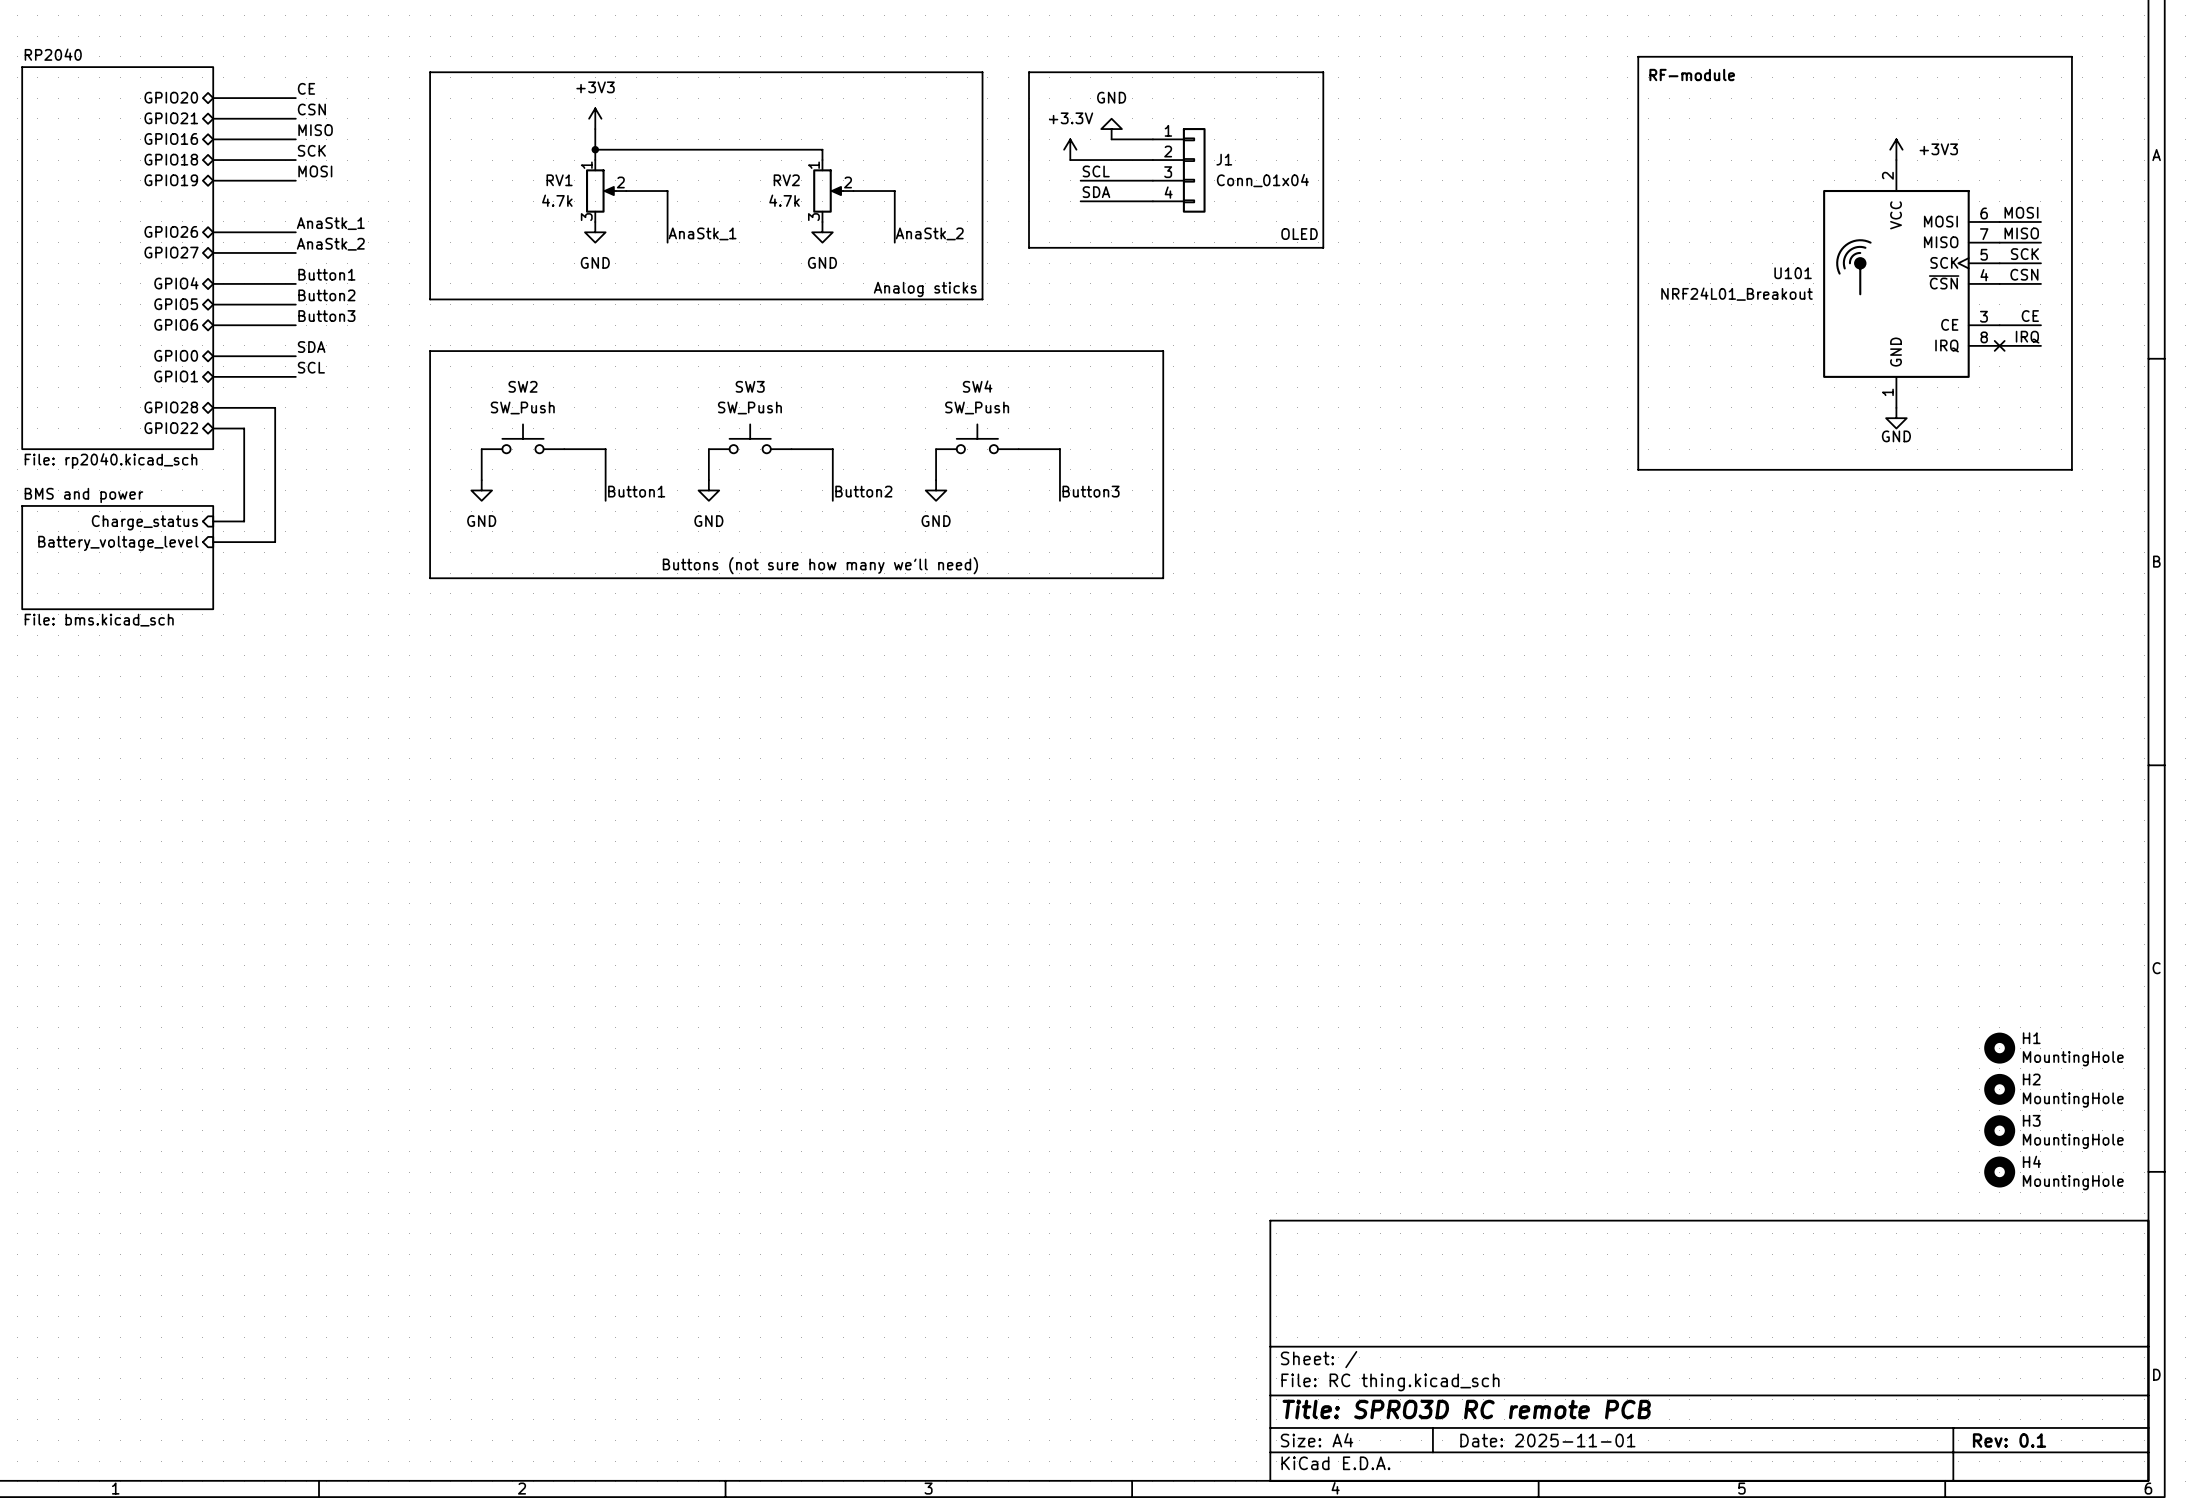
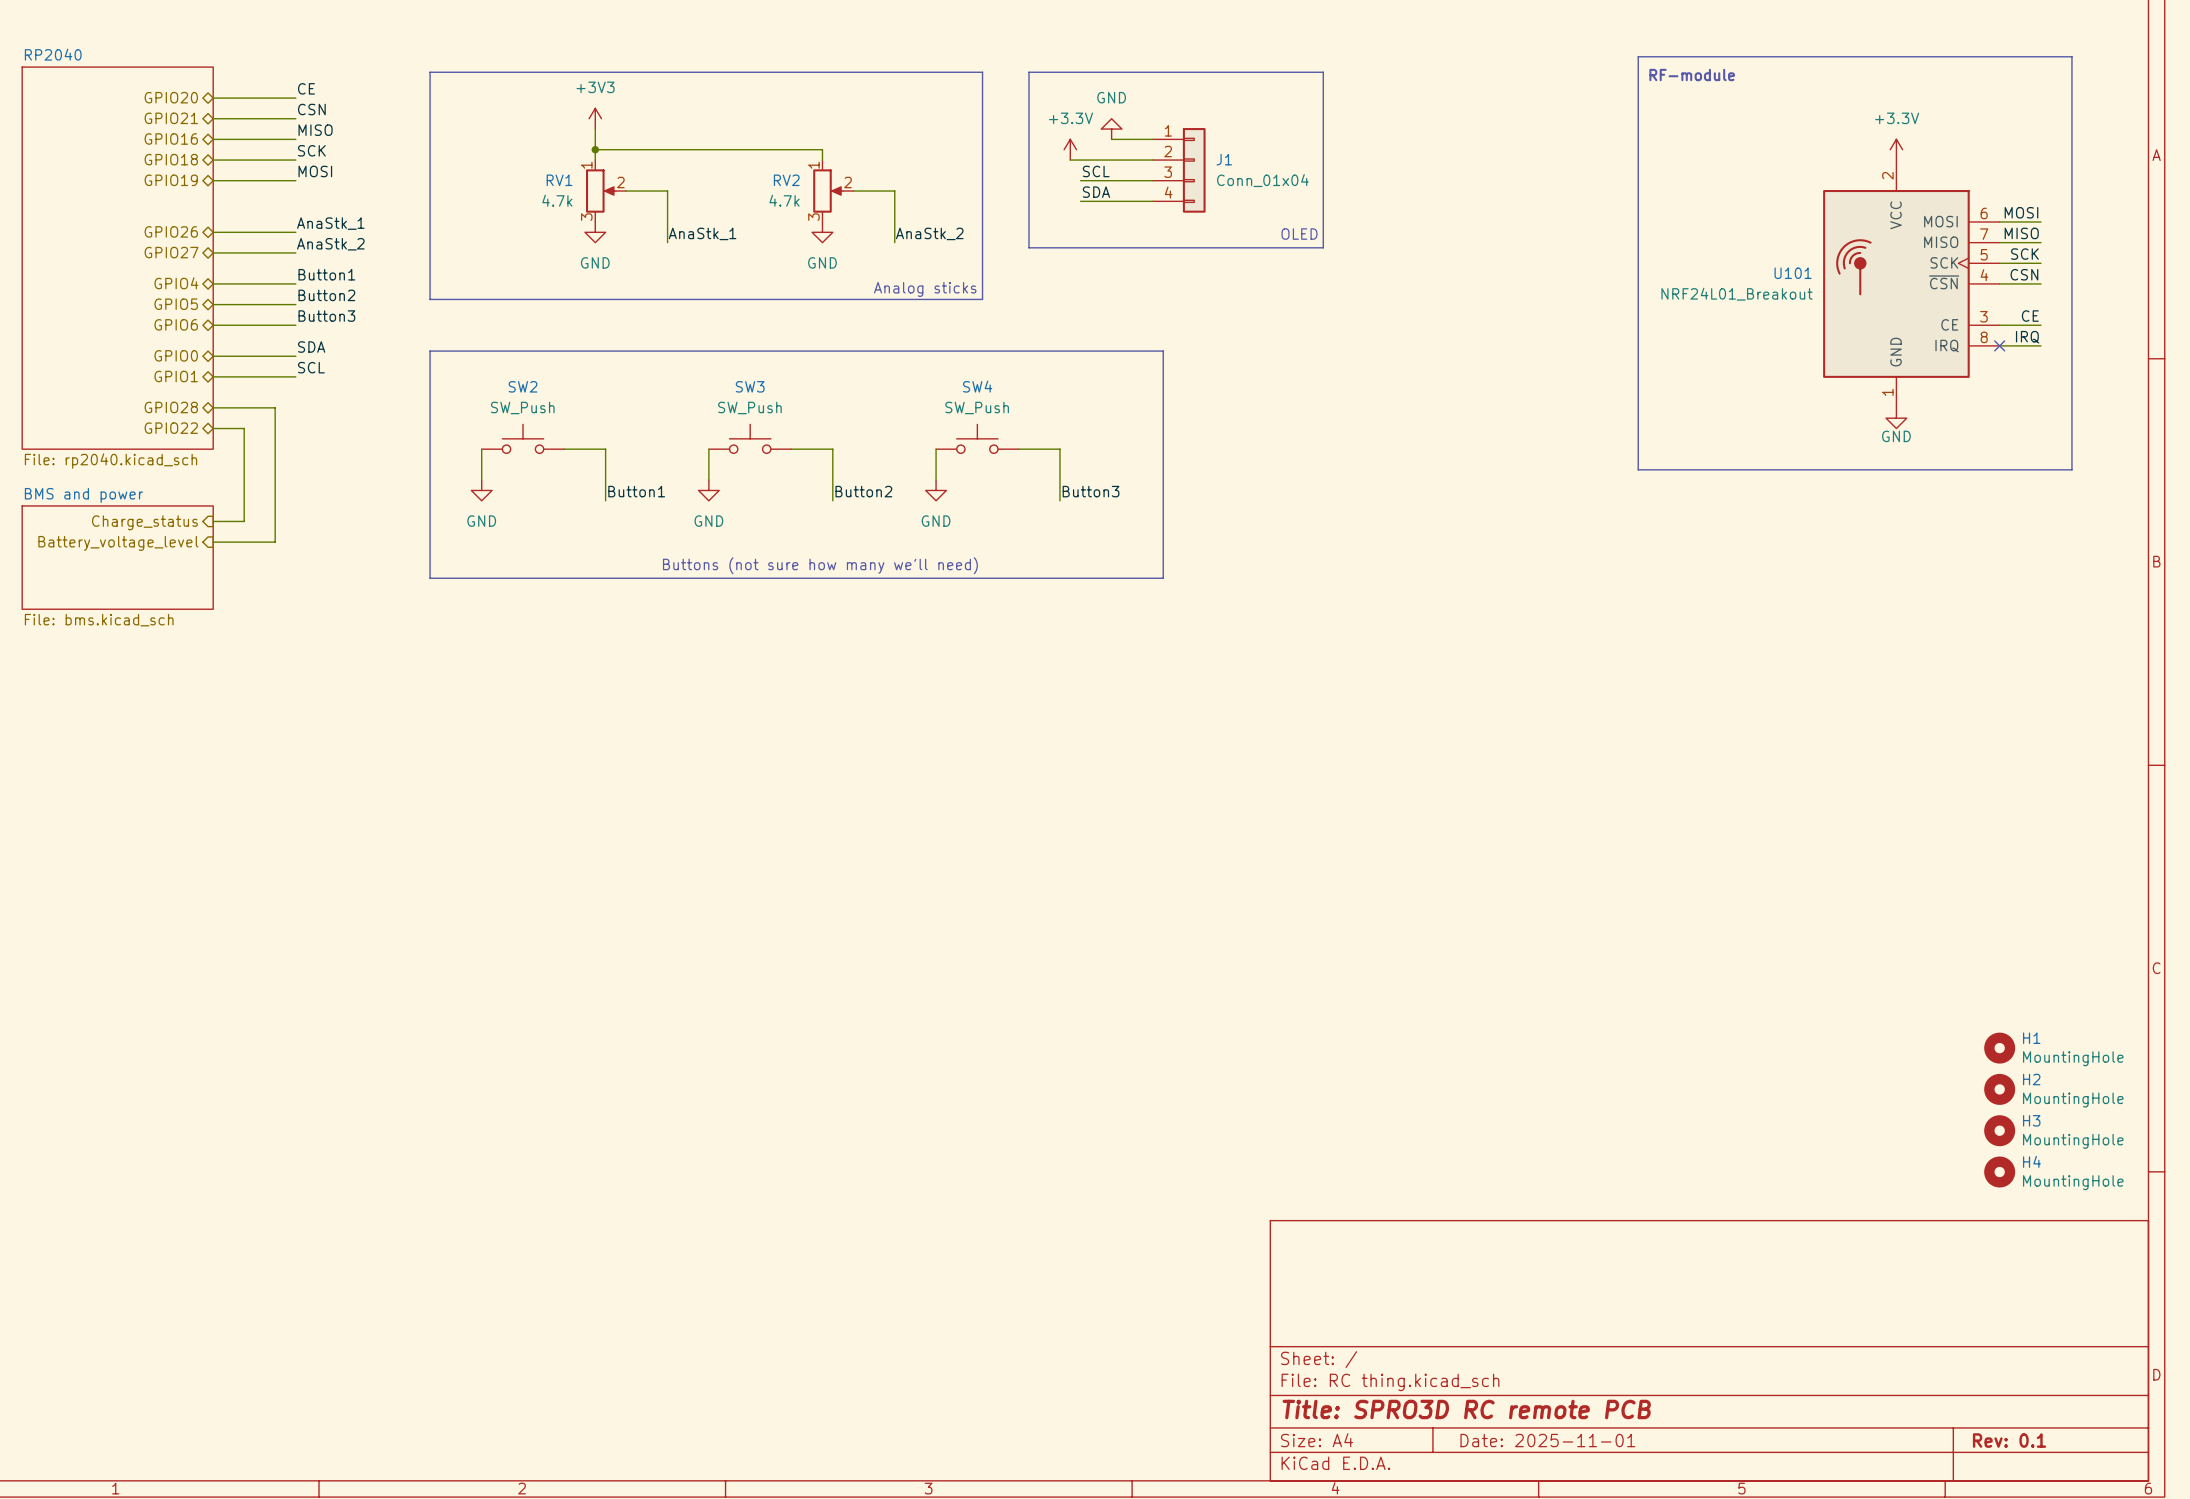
power symbol: +3V3 (1896, 149) -> +3.3V (1896, 149)

